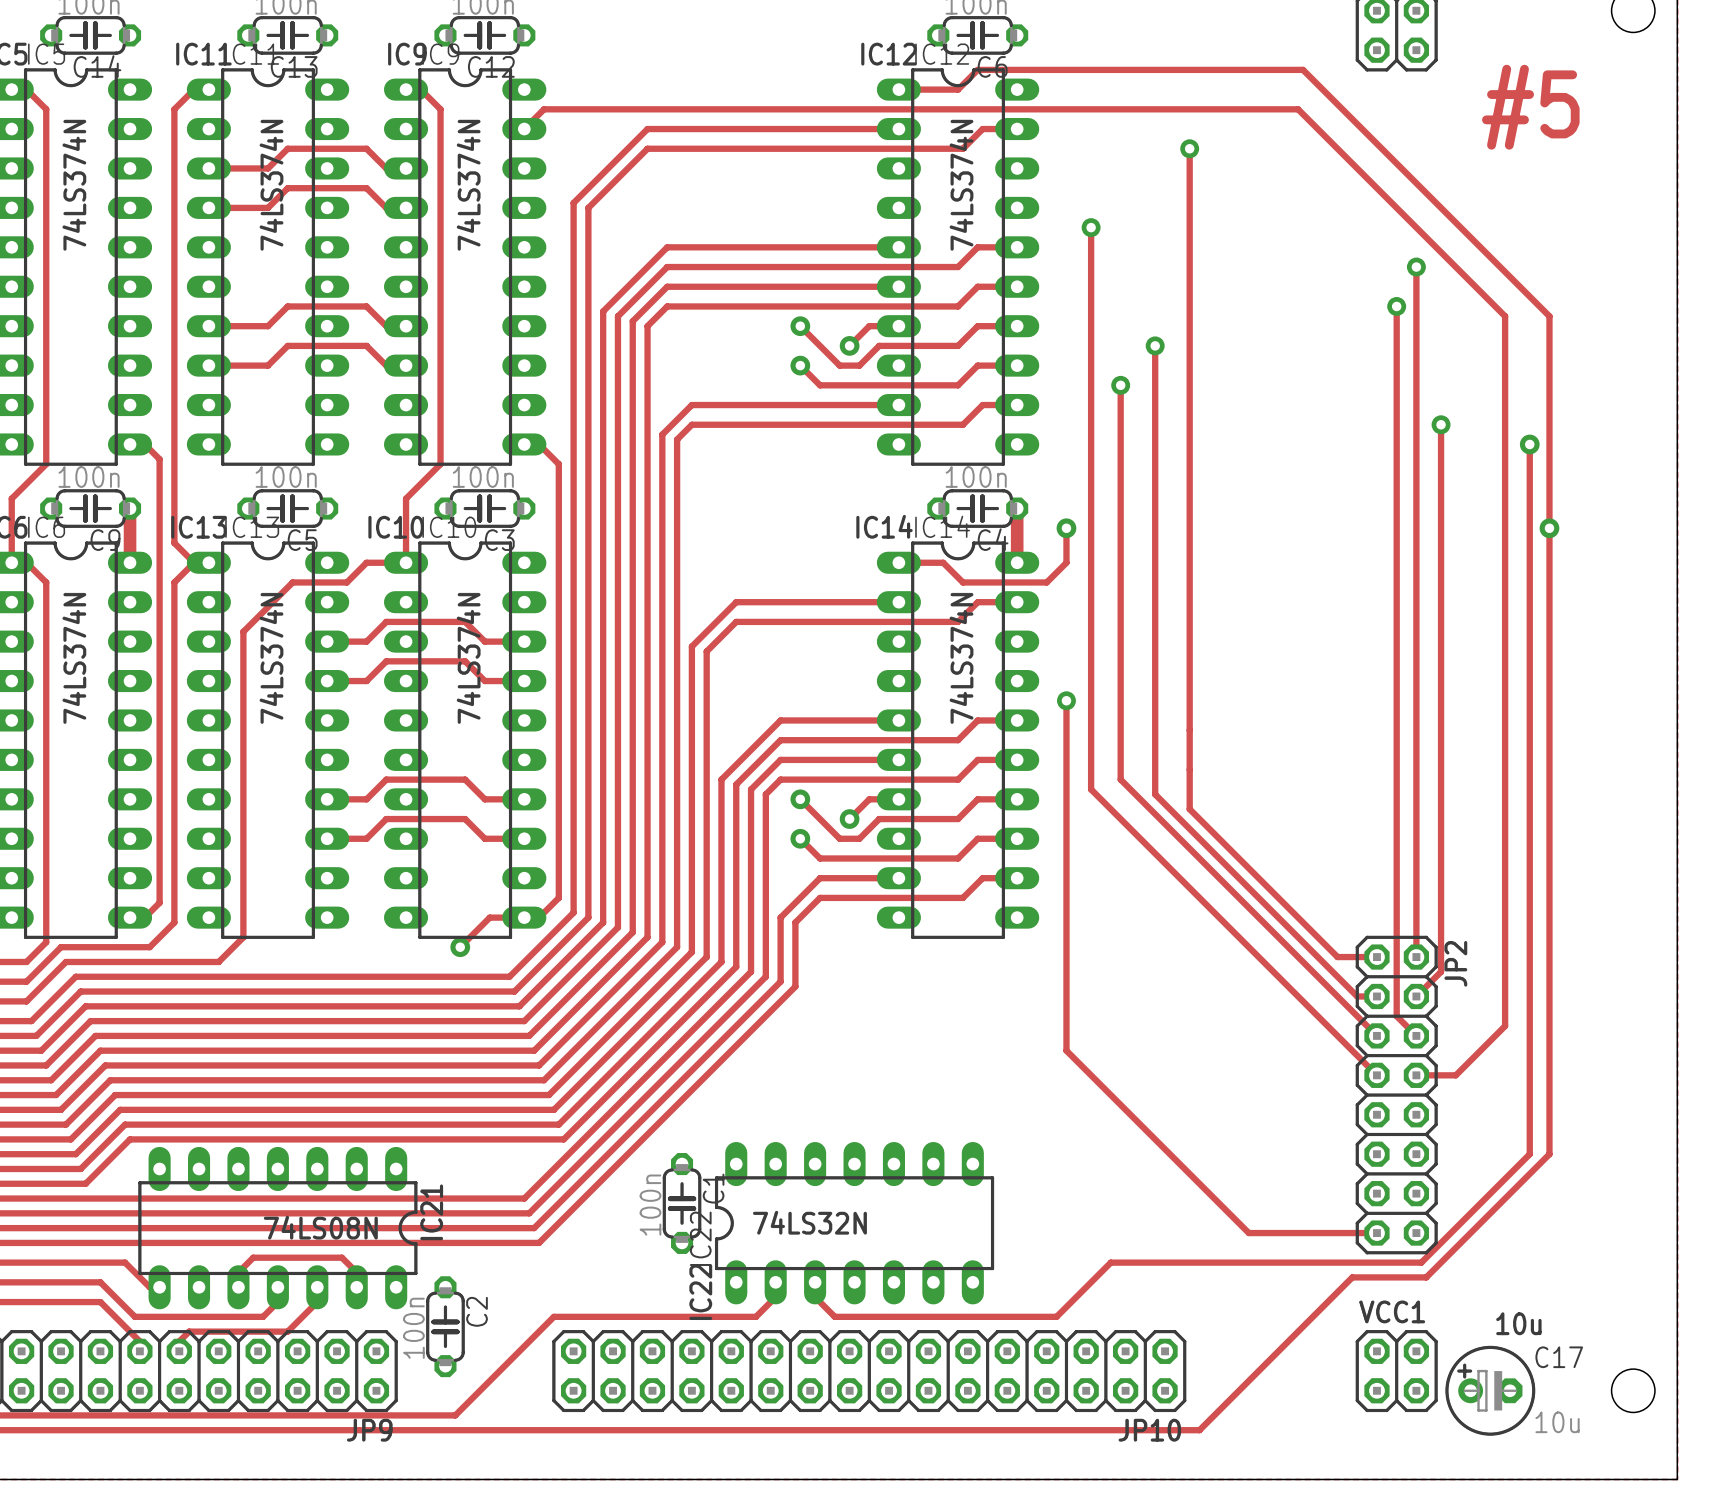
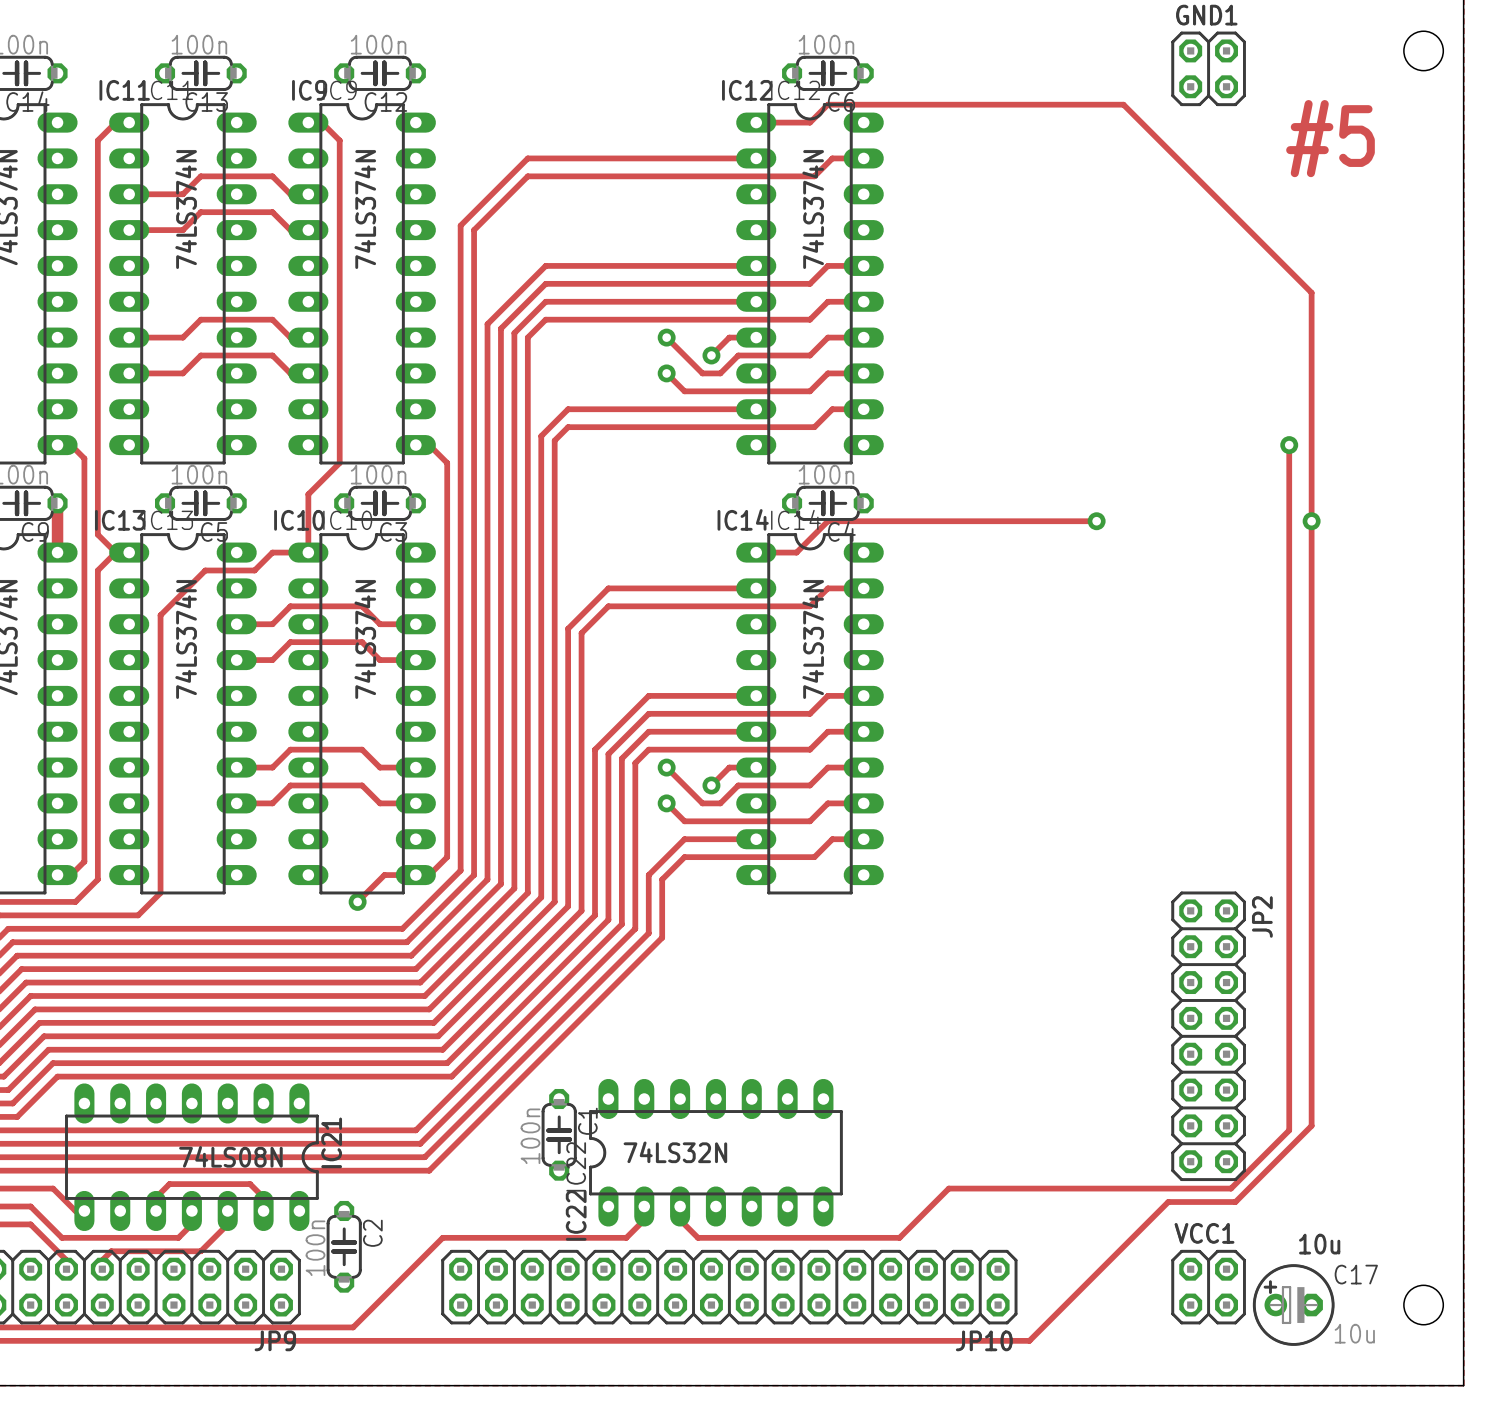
track: (524, 129) (544, 109) (1298, 109) (1505, 316) (1505, 1026) (1455, 1075) (1416, 1075) -> none
track: (1189, 148) (1189, 809) (1337, 957) (1376, 957) -> none
via: (1189, 148) -> none
track: (1091, 227) (1091, 789) (1376, 1075) -> none
via: (1091, 227) -> none
track: (1416, 267) (1416, 957) -> none
via: (1416, 267) -> none
track: (1510, 276) (1549, 316) (1549, 1154) (1510, 1193) -> (1311, 292) (1311, 1125)
track: (1396, 306) (1396, 1016) (1416, 1035) -> none
via: (1396, 306) -> none
track: (1155, 345) (1155, 794) (1357, 996) (1376, 996) -> none
via: (1155, 345) -> none
track: (1120, 385) (1120, 779) (1376, 1035) -> none
via: (1120, 385) -> none
track: (1441, 424) (1441, 971) (1416, 996) -> none
via: (1441, 424) -> none
via: none -> (1289, 445)
track: (1529, 444) (1529, 1154) (1485, 1198) -> (1289, 445) (1289, 1130)
via: (1529, 444) -> none
track: (1017, 508) (1017, 562) -> none
track: (1066, 528) (1066, 562) (1046, 582) (962, 582) (943, 562) -> (1096, 521) (827, 521) (796, 552)
via: (1066, 528) -> none
via: none -> (1096, 521)
via position: (1549, 528) -> (1311, 521)
track: (1066, 700) (1066, 1050) (1248, 1233) (1376, 1233) -> none
via: (1066, 700) -> none

